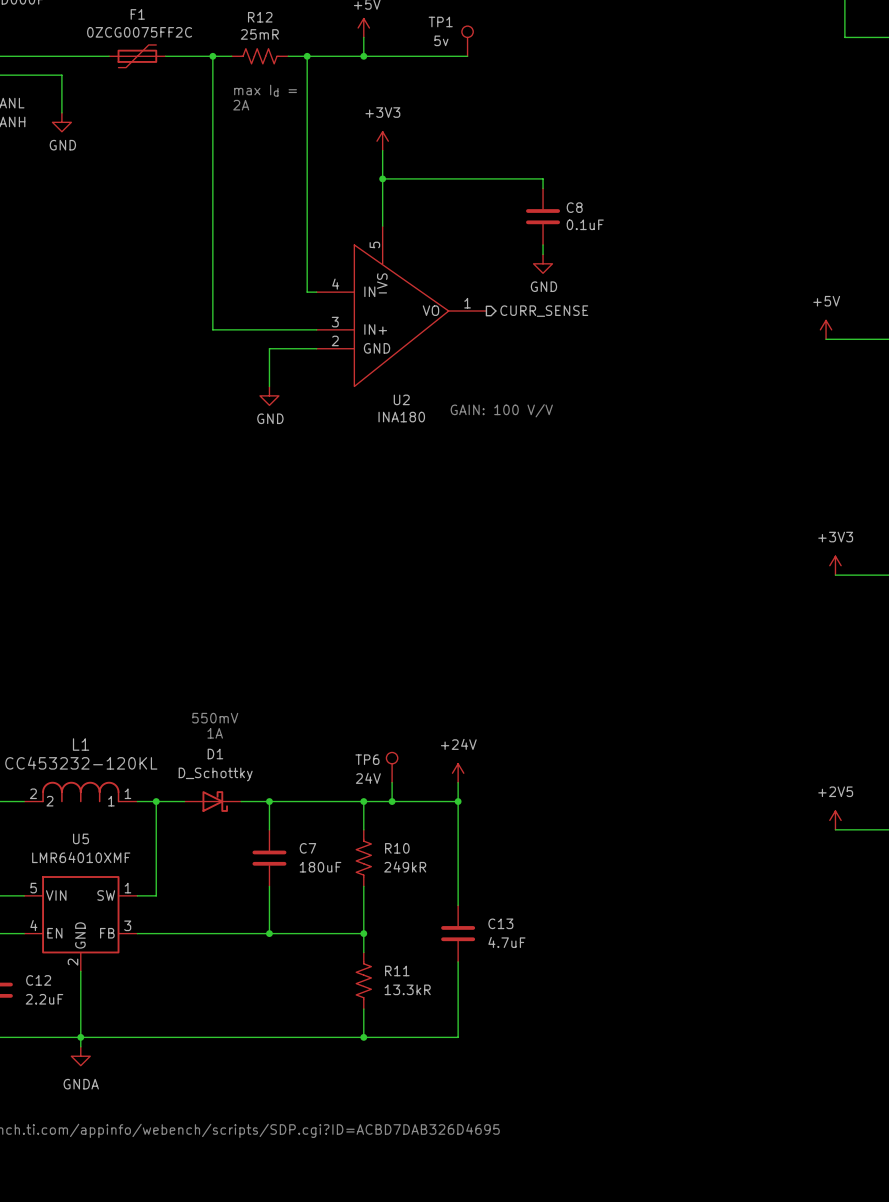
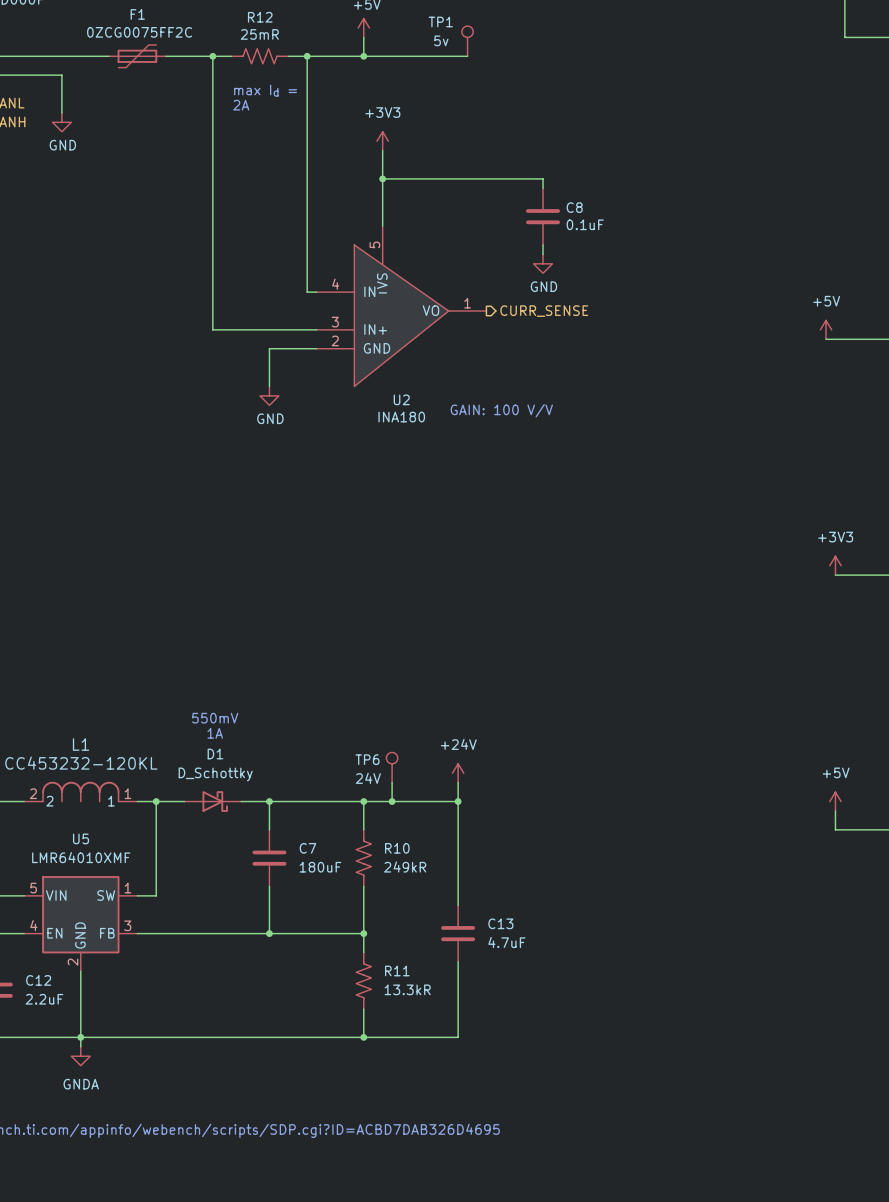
power symbol: none -> +5V (835, 801)
power symbol: +2V5 (835, 820) -> none

